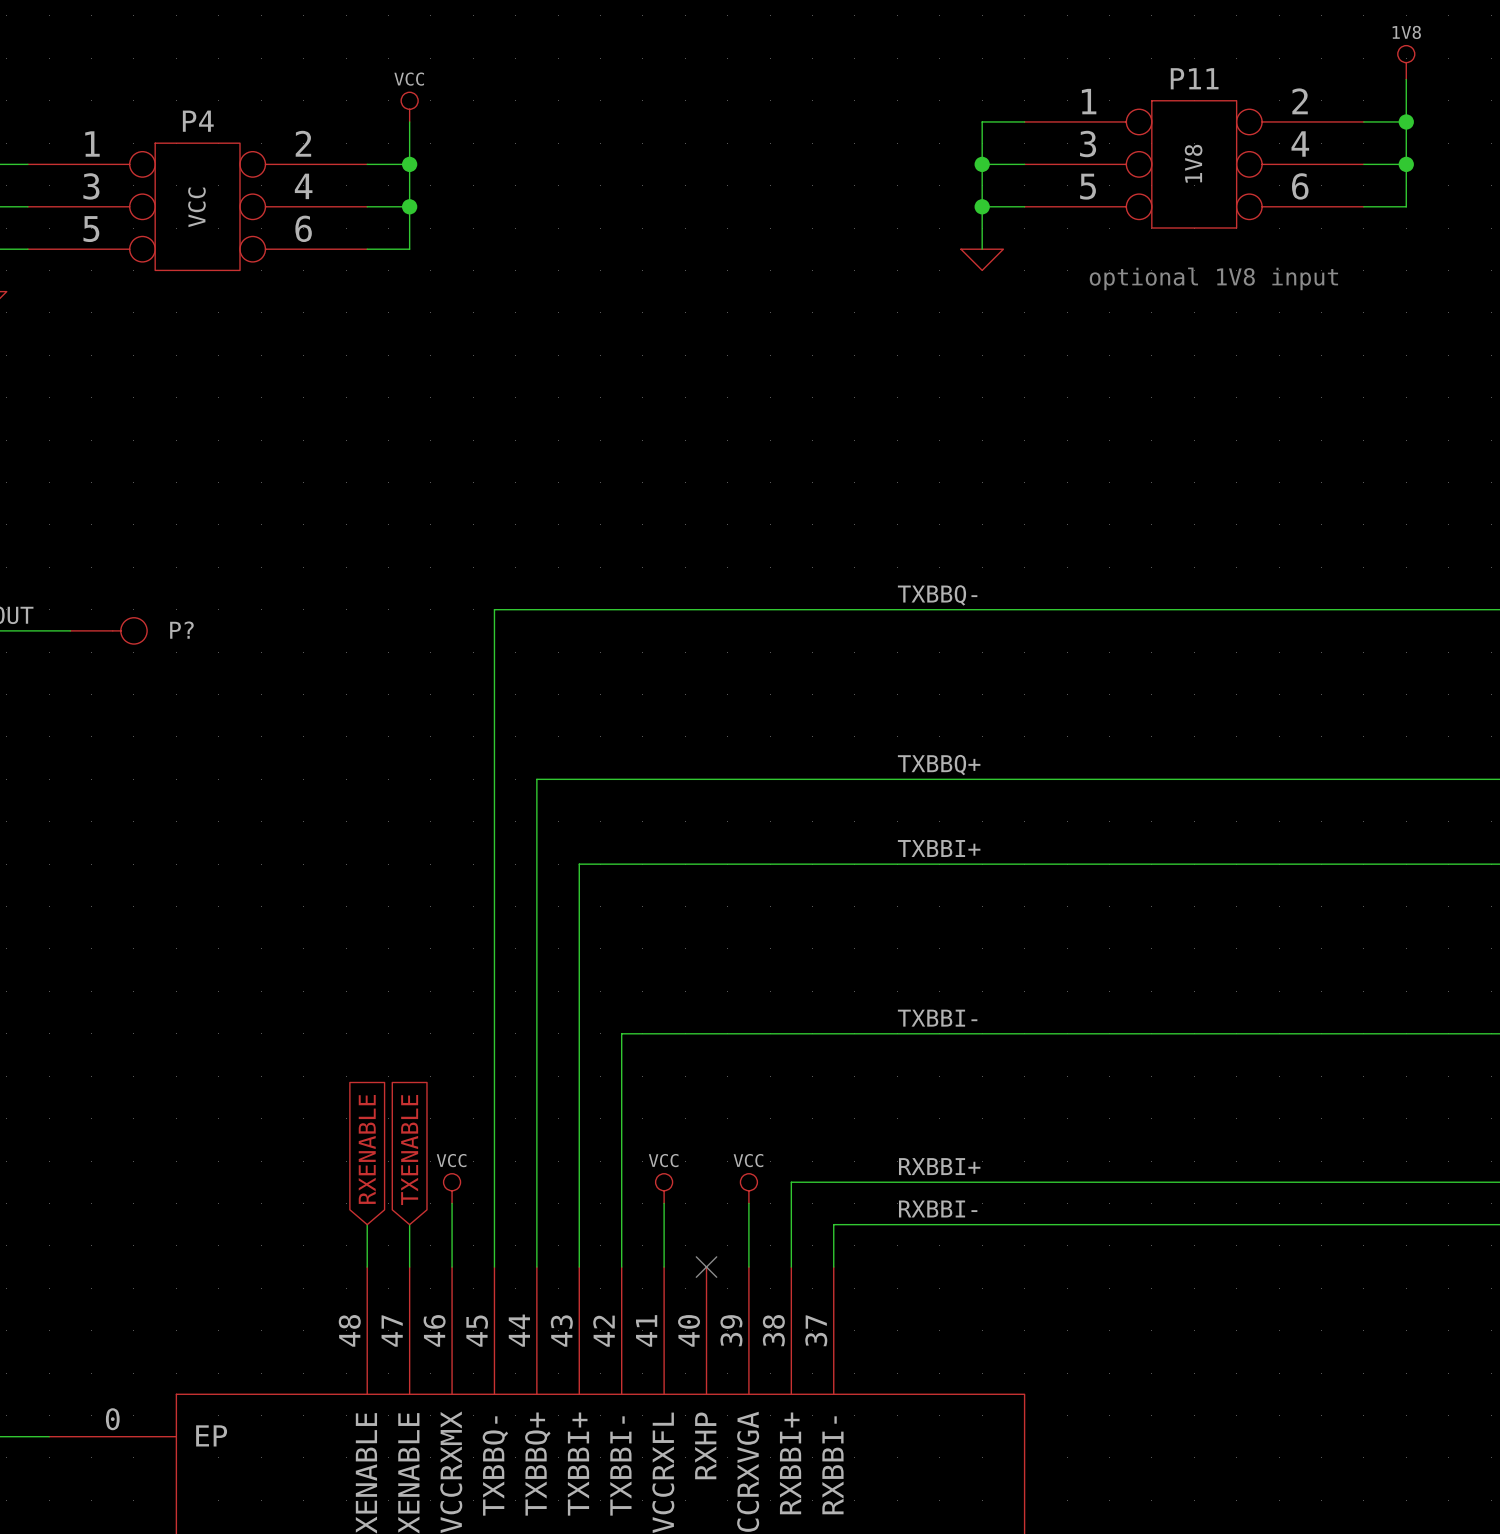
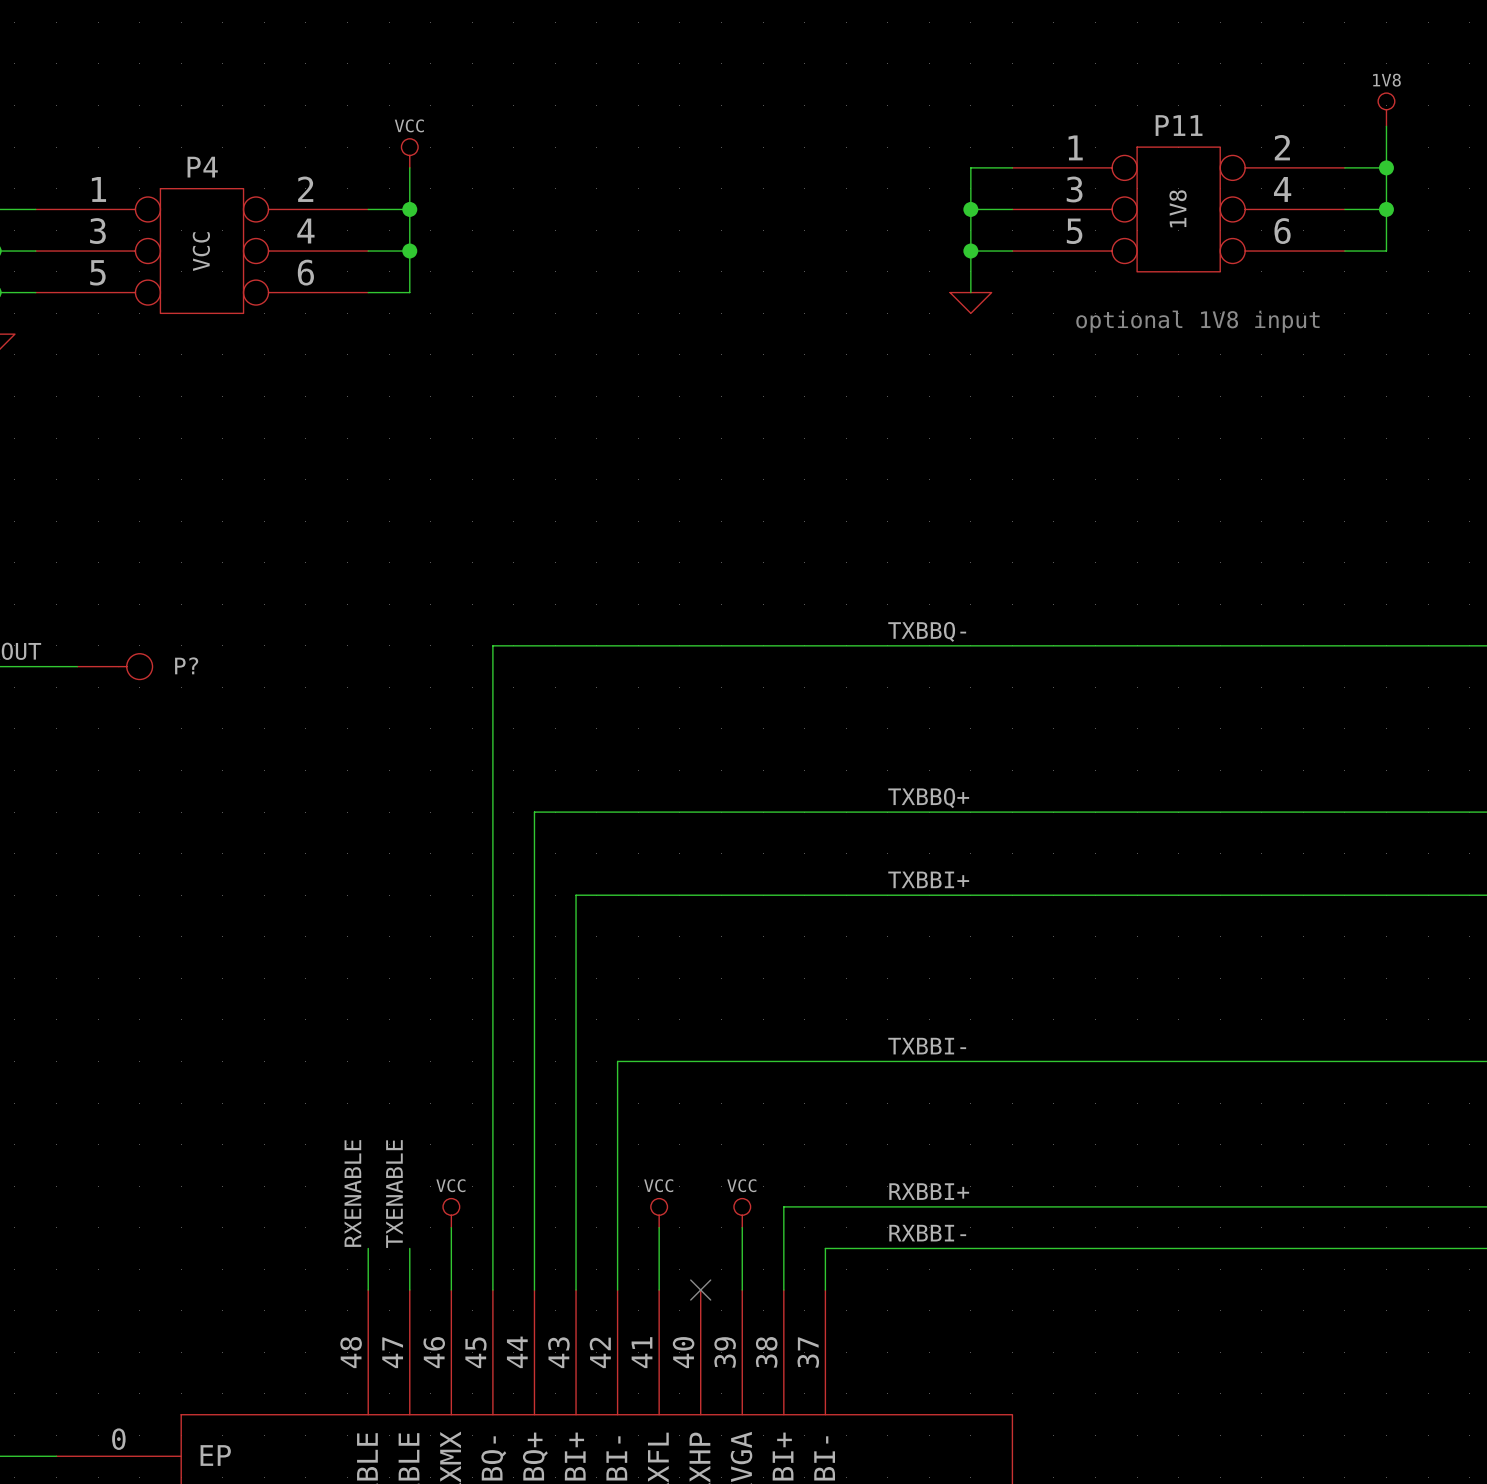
global label: RXENABLE (367, 1149) -> none
global label: TXENABLE (409, 1150) -> none
label: none -> RXENABLE (352, 1193)
label: none -> TXENABLE (394, 1194)

